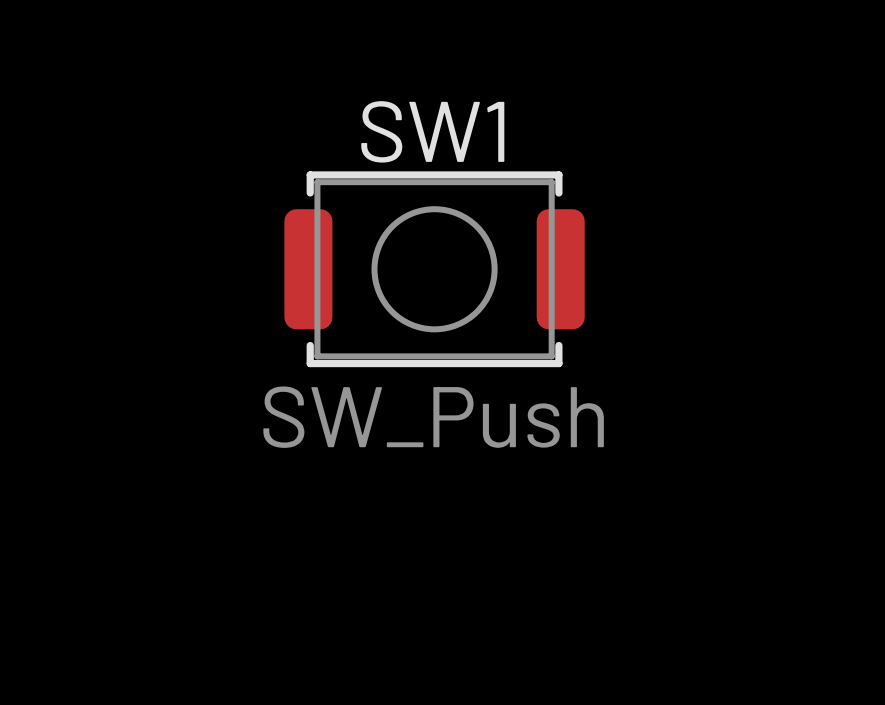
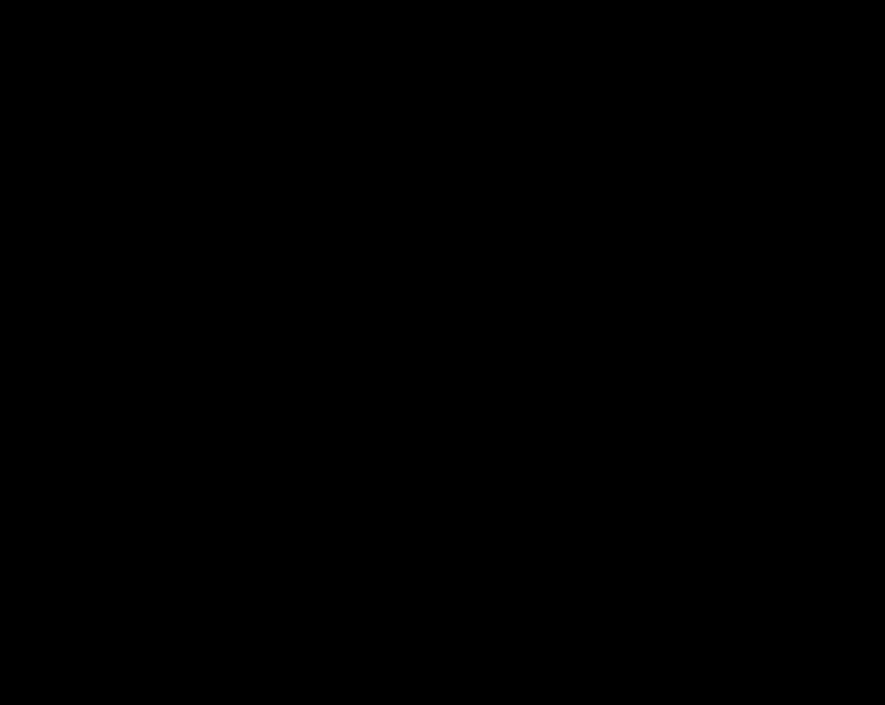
SW1: SW_Push (434, 269) -> none

